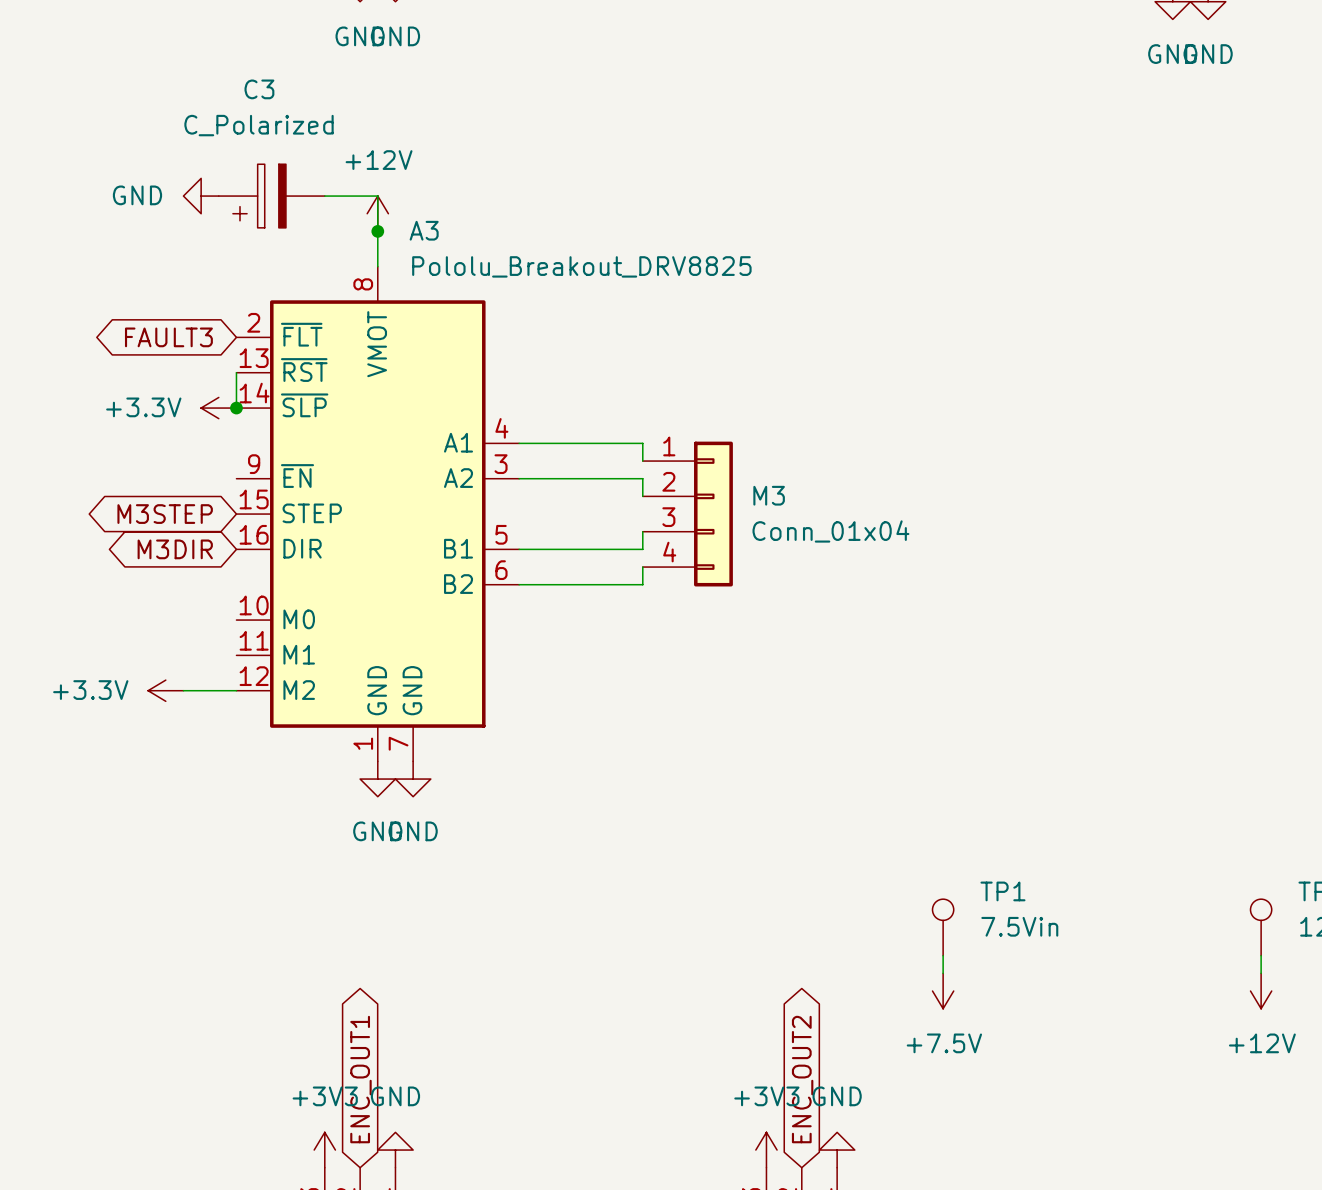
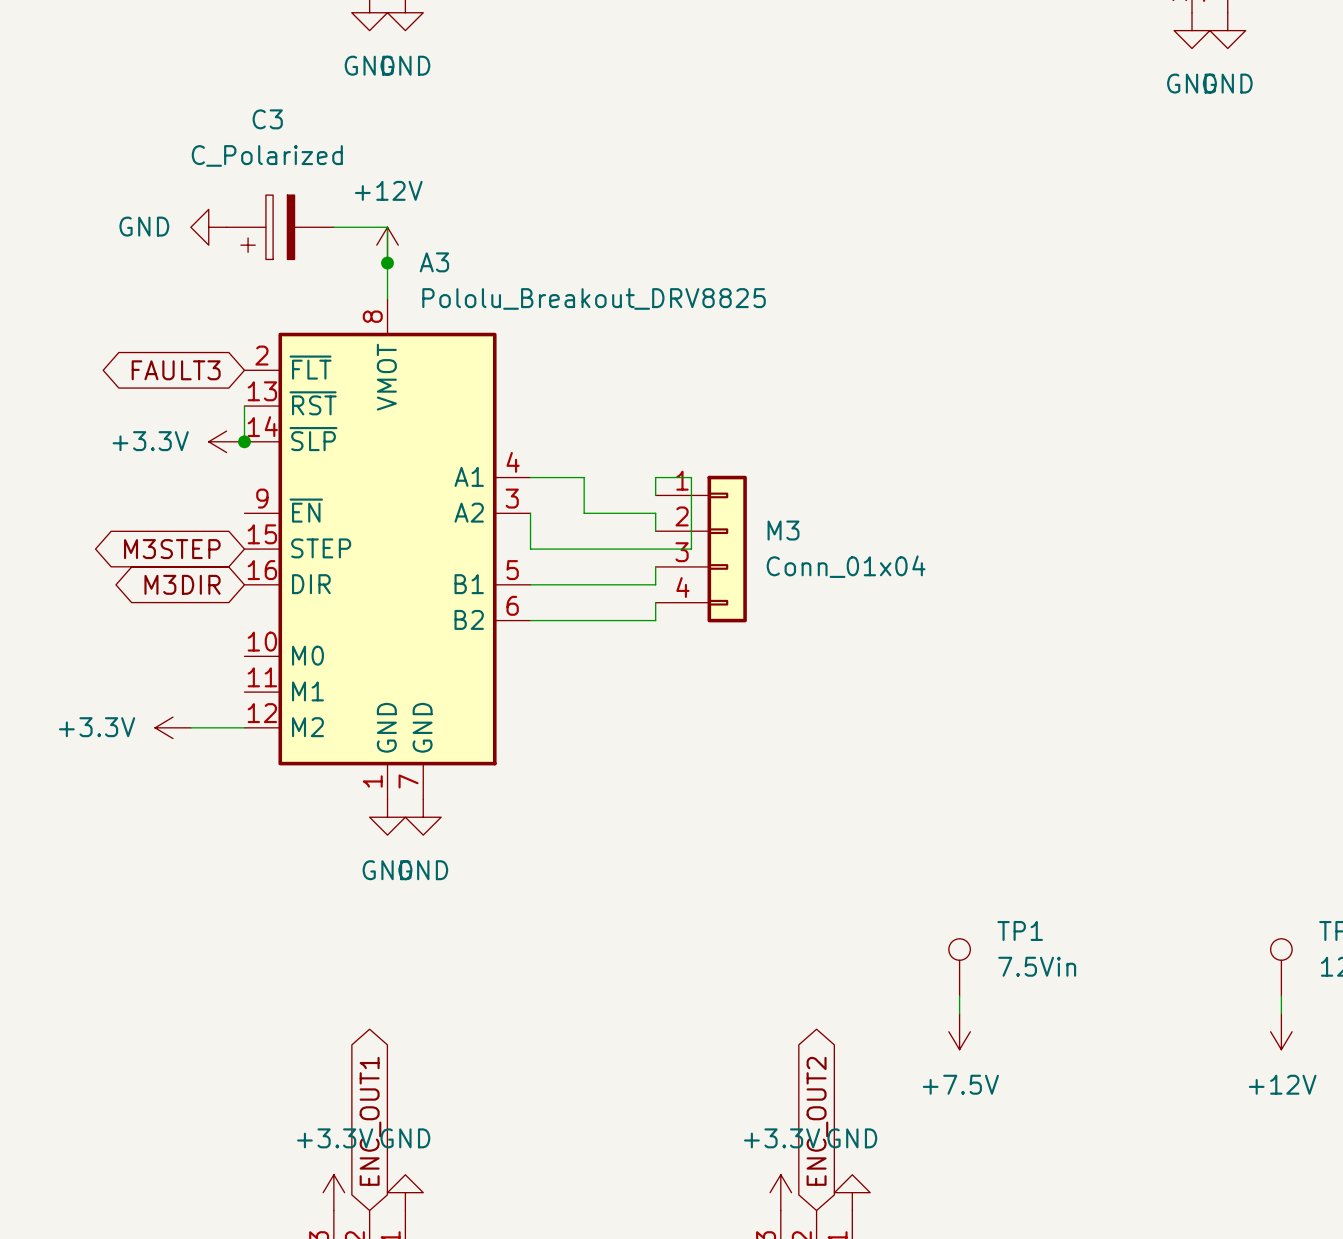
wire: (572, 443) (642, 443) -> (530, 513) (530, 549) (691, 549) (691, 477) (655, 477)
wire: (519, 478) (572, 478) -> (584, 477) (584, 513)
power symbol: +3V3 (324, 1150) -> +3.3V (333, 1192)
power symbol: +3V3 (766, 1150) -> +3.3V (780, 1192)

